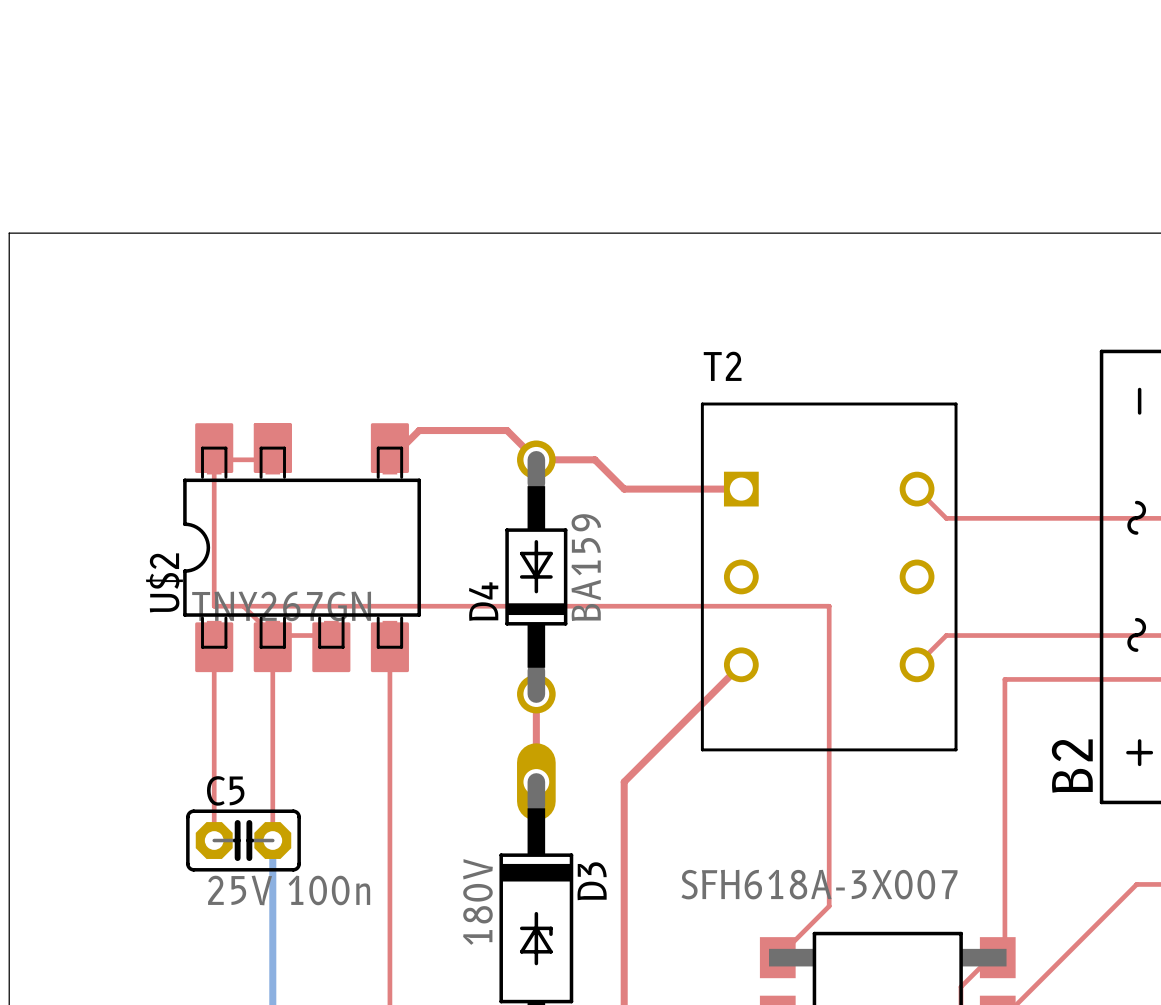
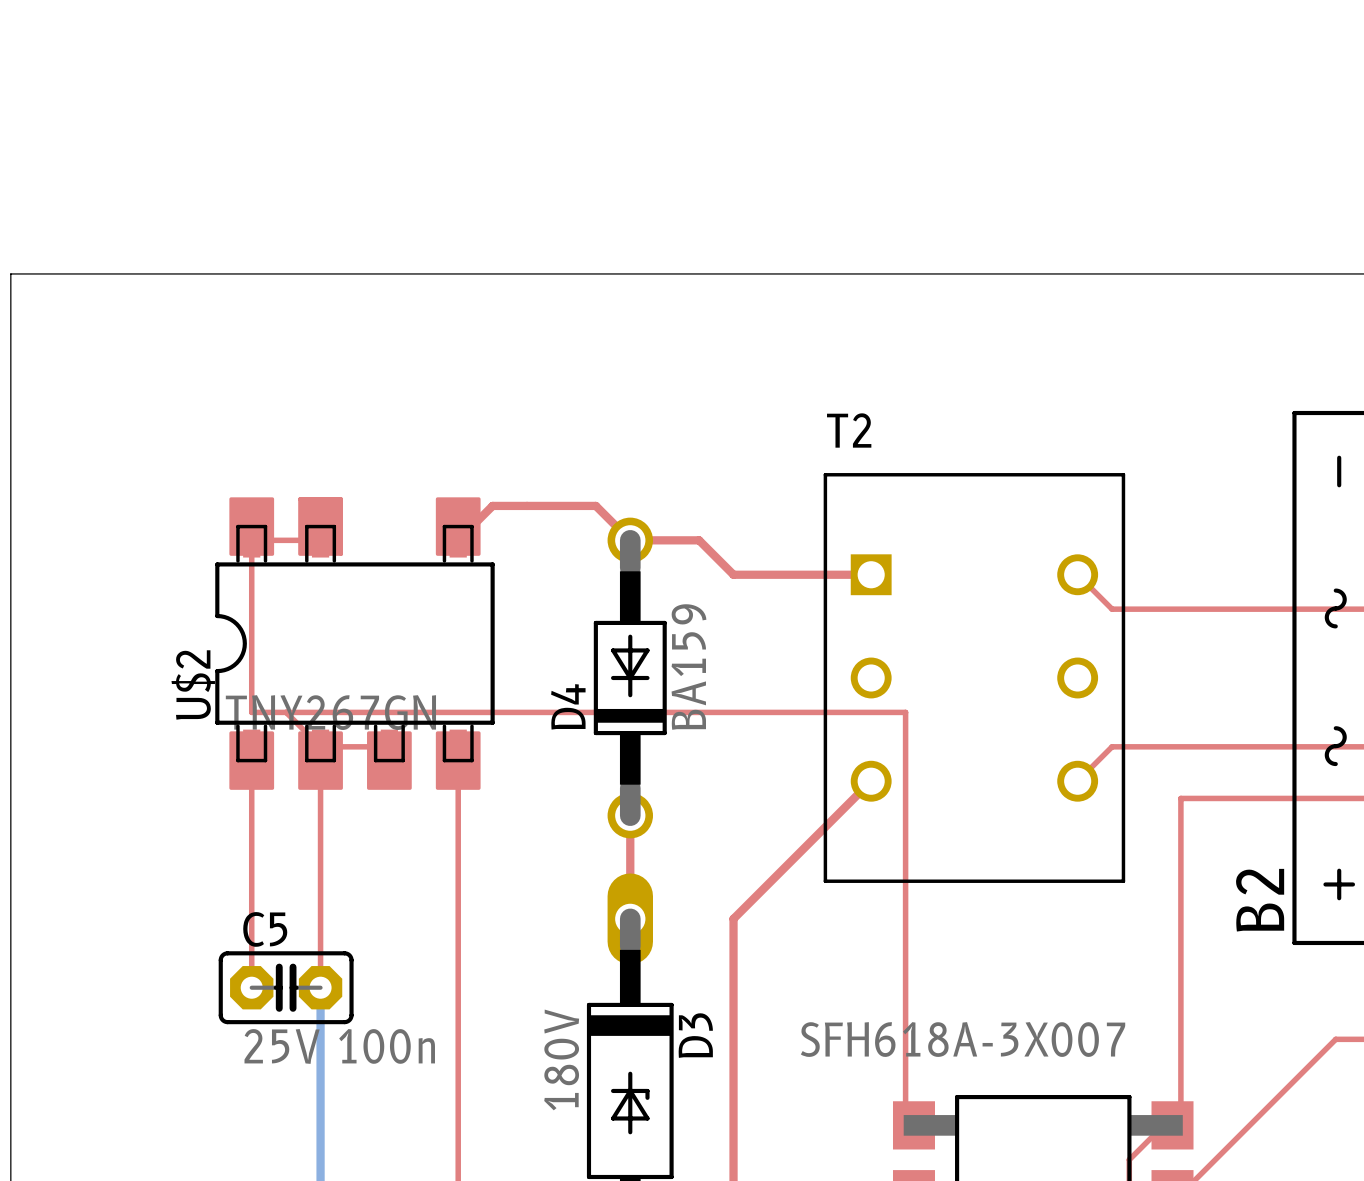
top track: (770, 606) (829, 606) (829, 906) (777, 957) -> (905, 712) (905, 1125) (913, 1125)

